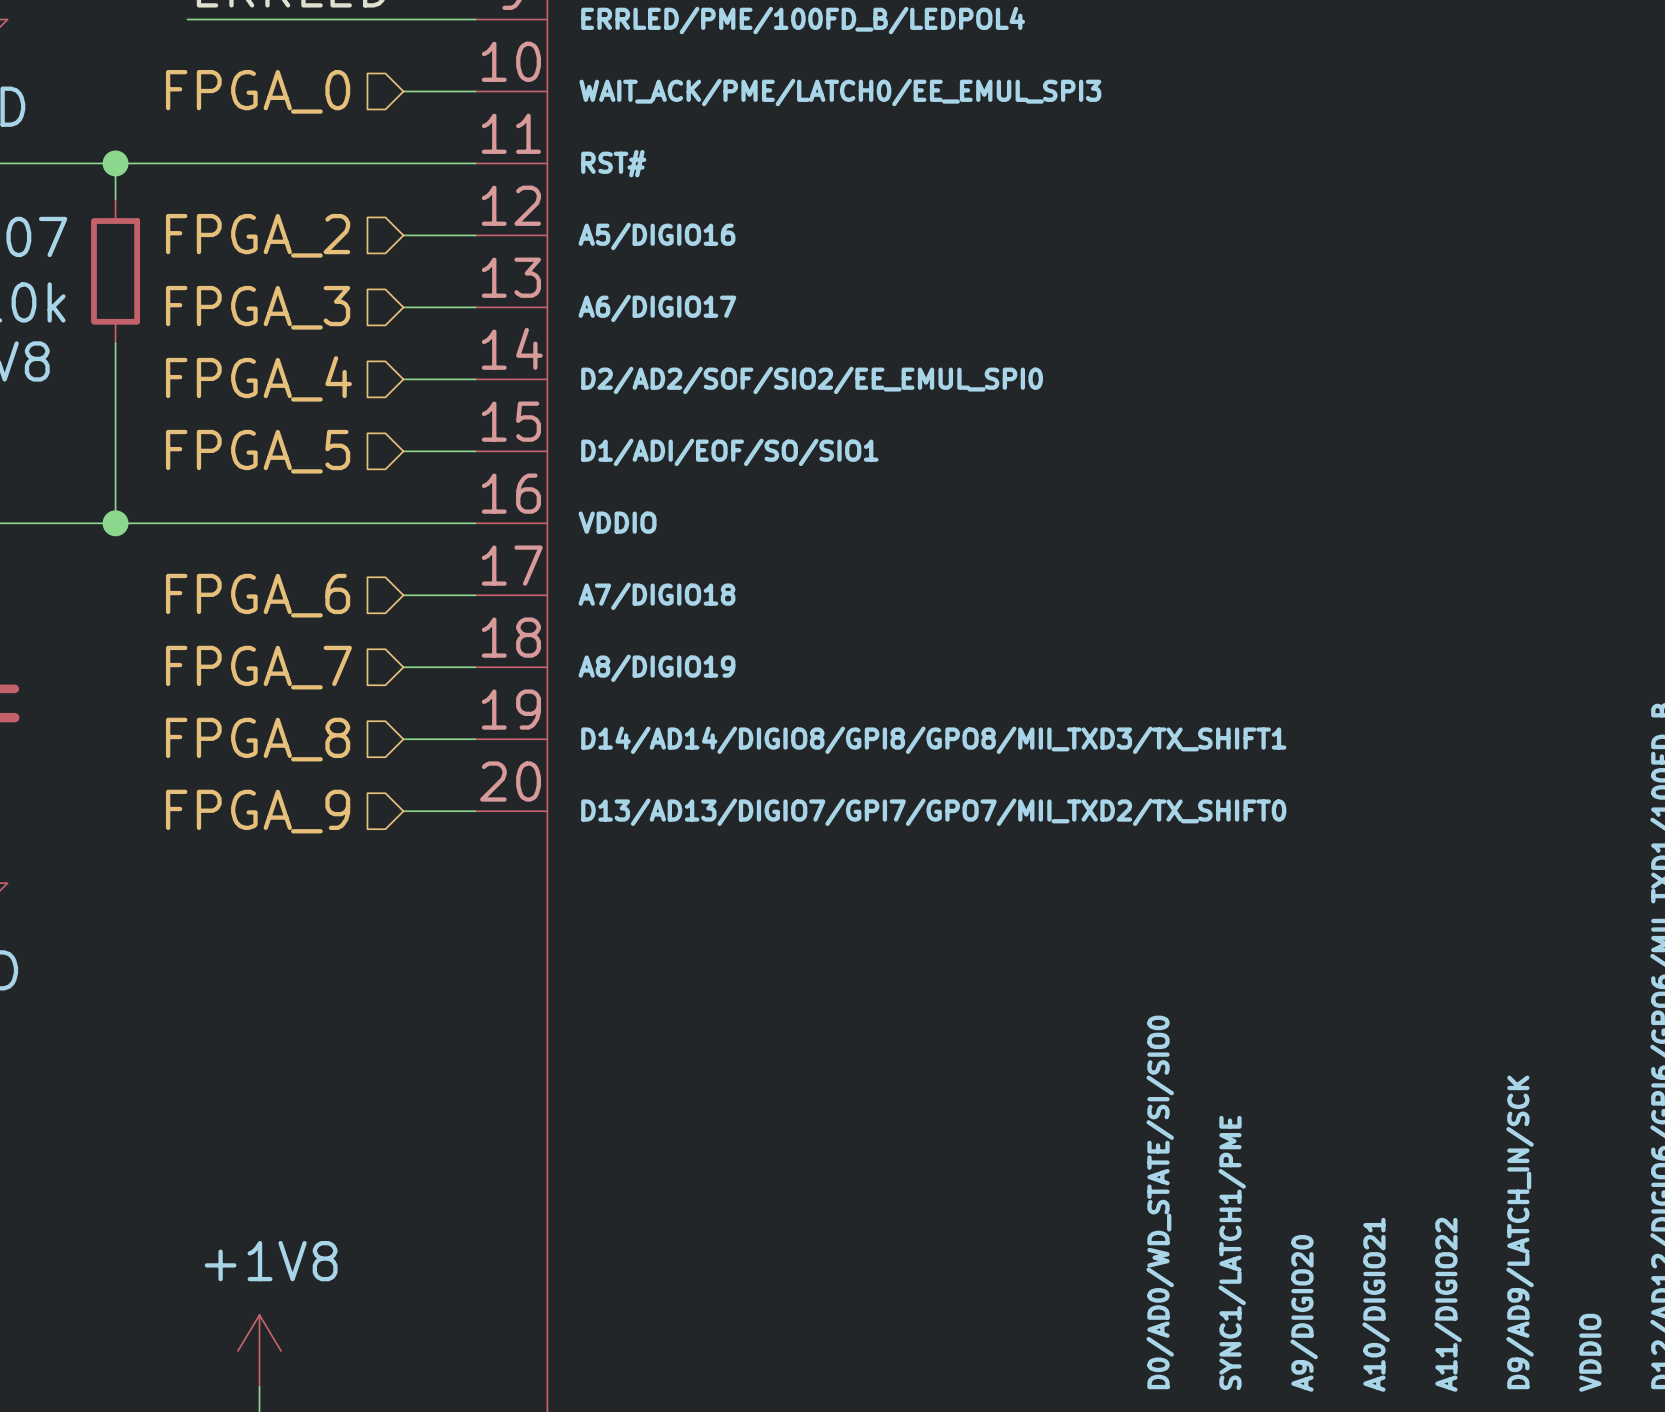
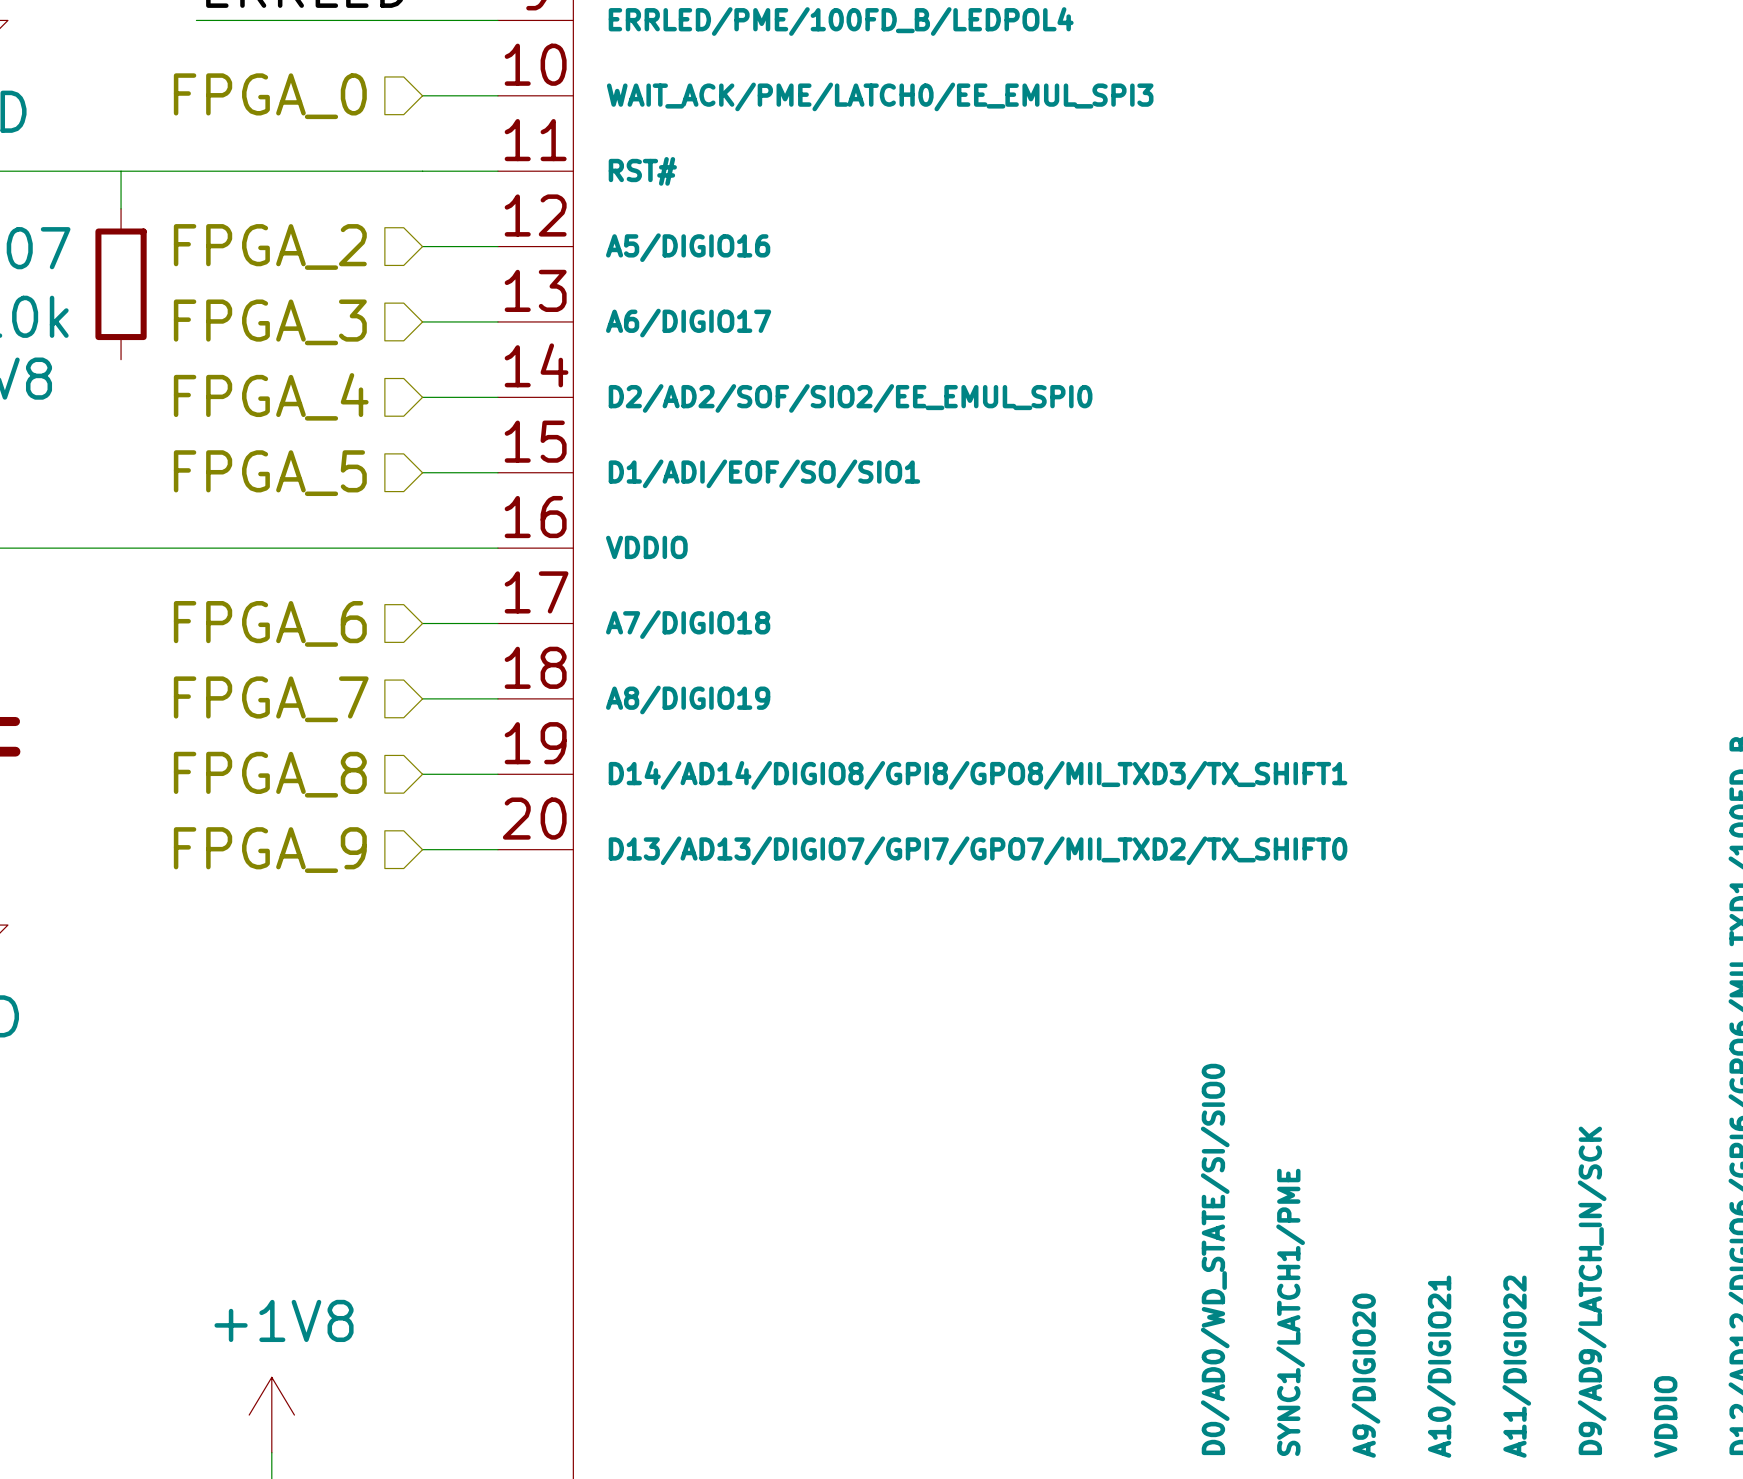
junction: (115, 163) -> none
wire: (115, 343) (115, 523) -> none
junction: (115, 523) -> none

